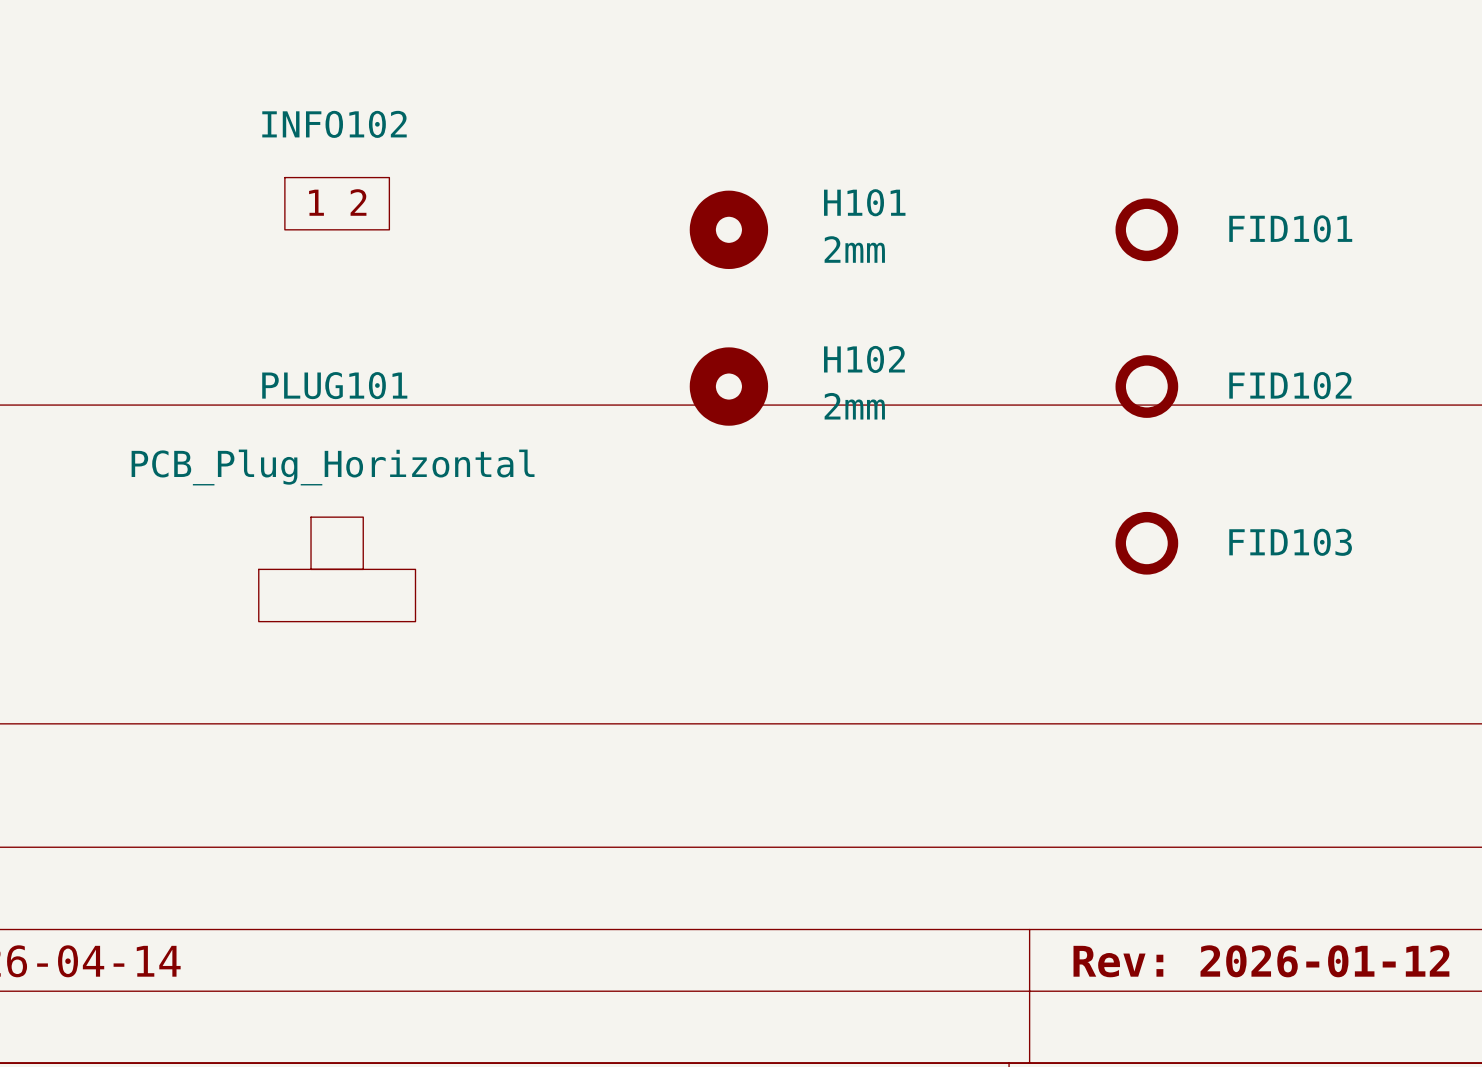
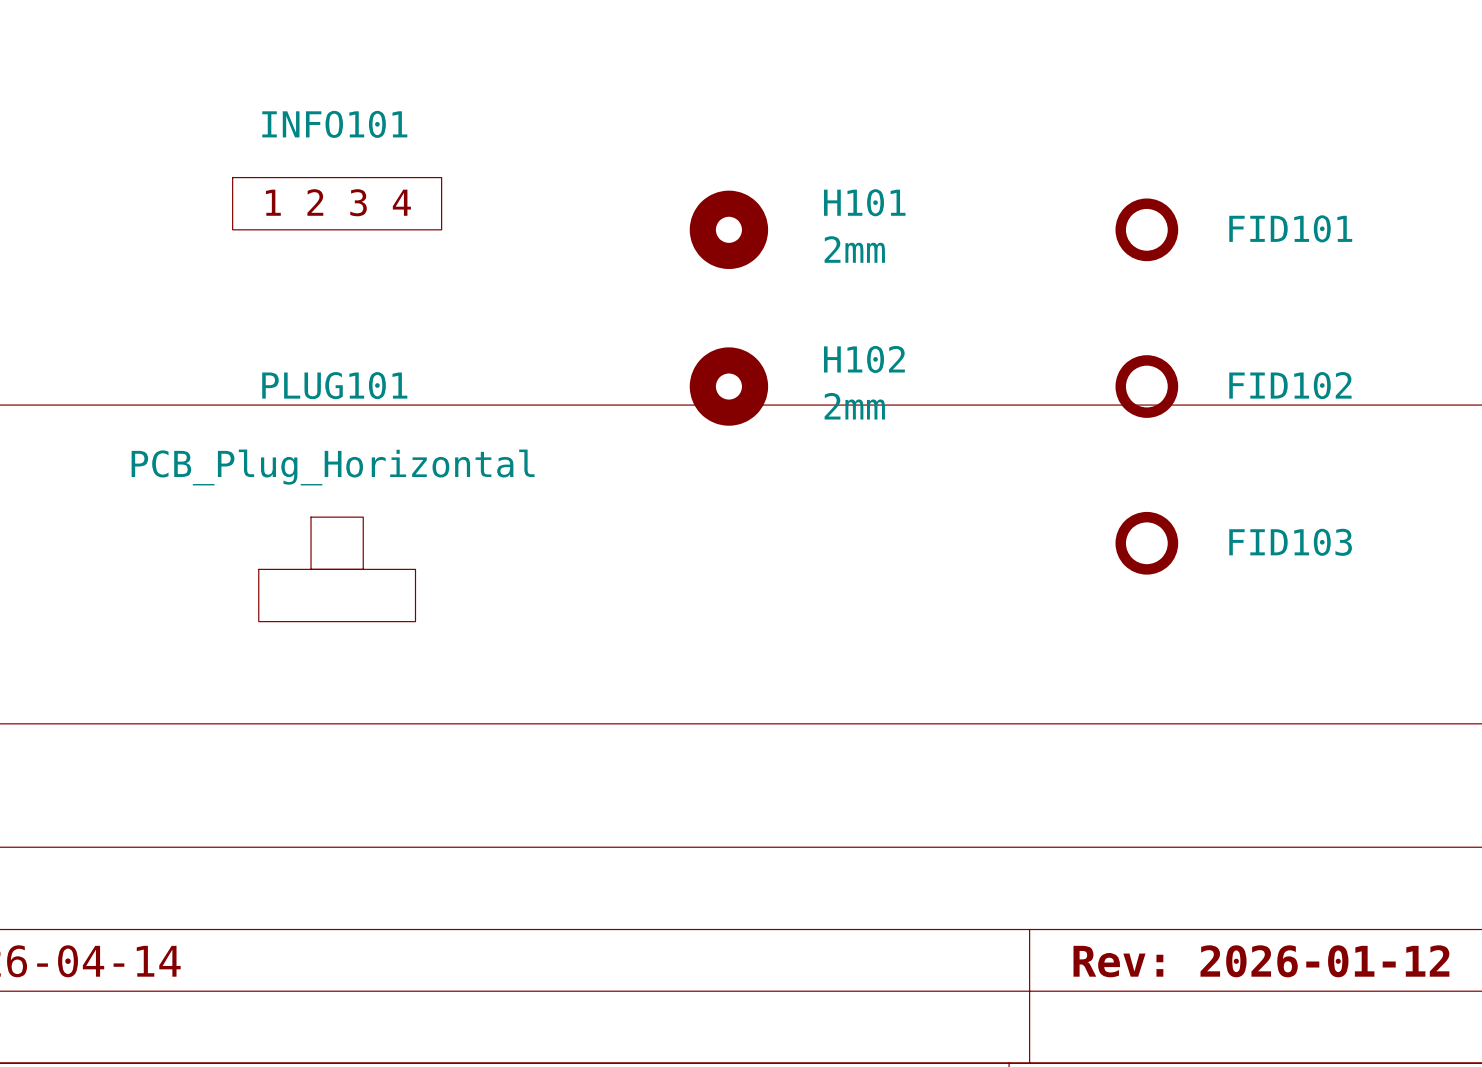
INFO102: (337, 203) -> none
INFO101: none -> (337, 203)

